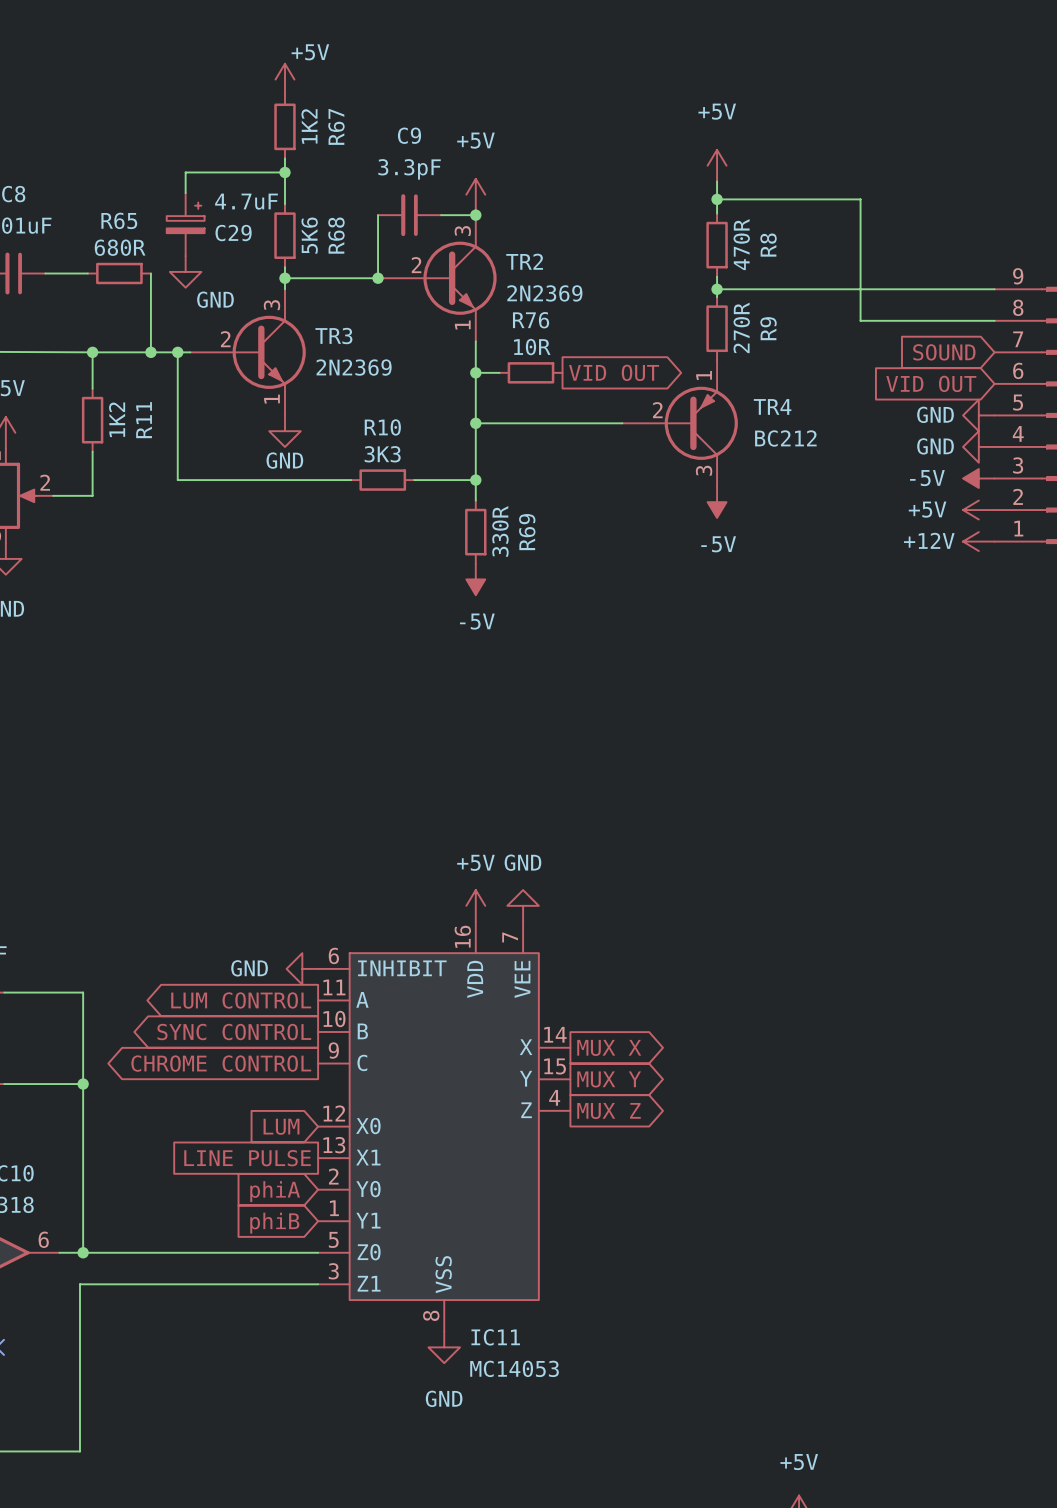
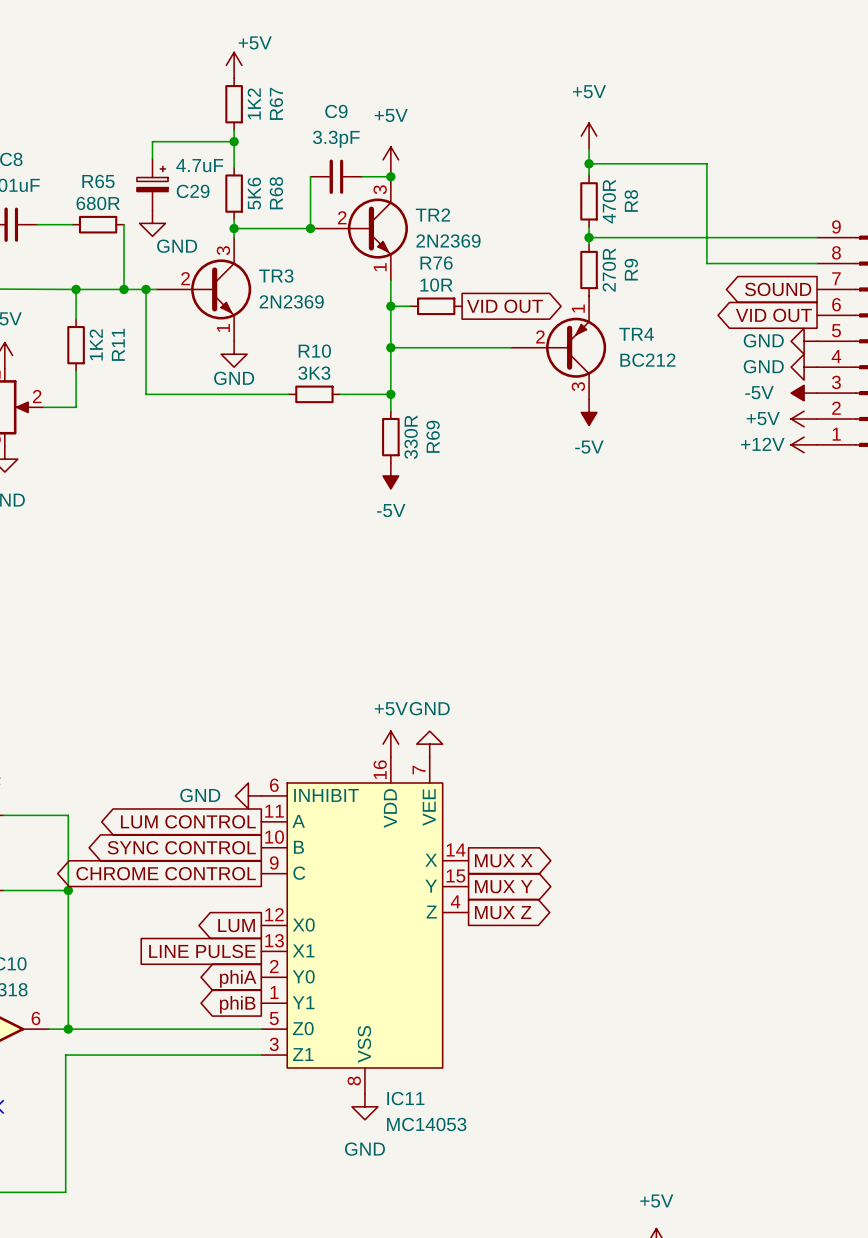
global label shape: input (944, 352) -> output (778, 289)
global label shape: input (931, 383) -> output (773, 315)
global label shape: input (281, 1126) -> output (236, 925)
global label shape: input (275, 1191) -> output (238, 978)
global label shape: input (274, 1223) -> output (237, 1004)

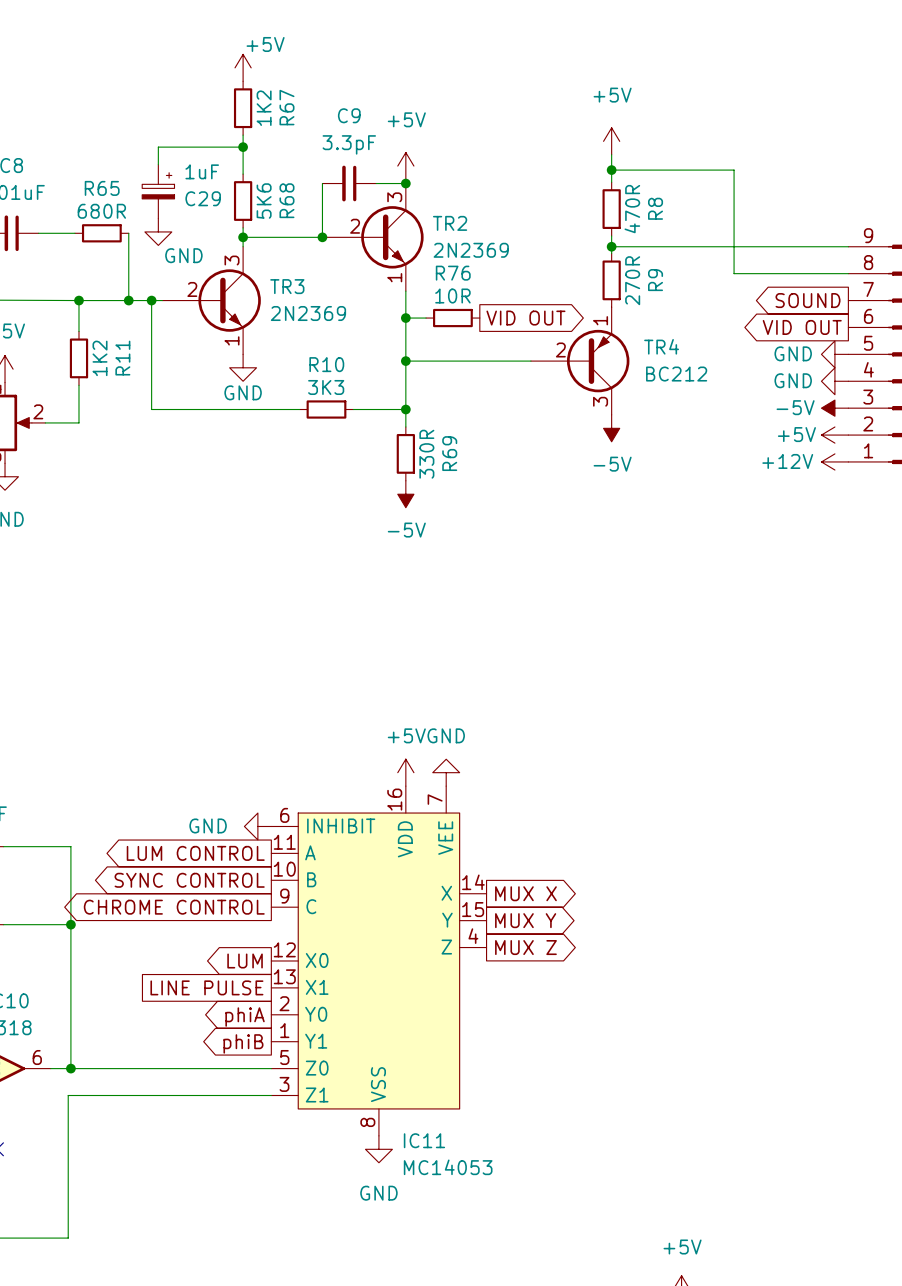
C29 value: 4.7uF (199, 165) -> 1uF (202, 171)

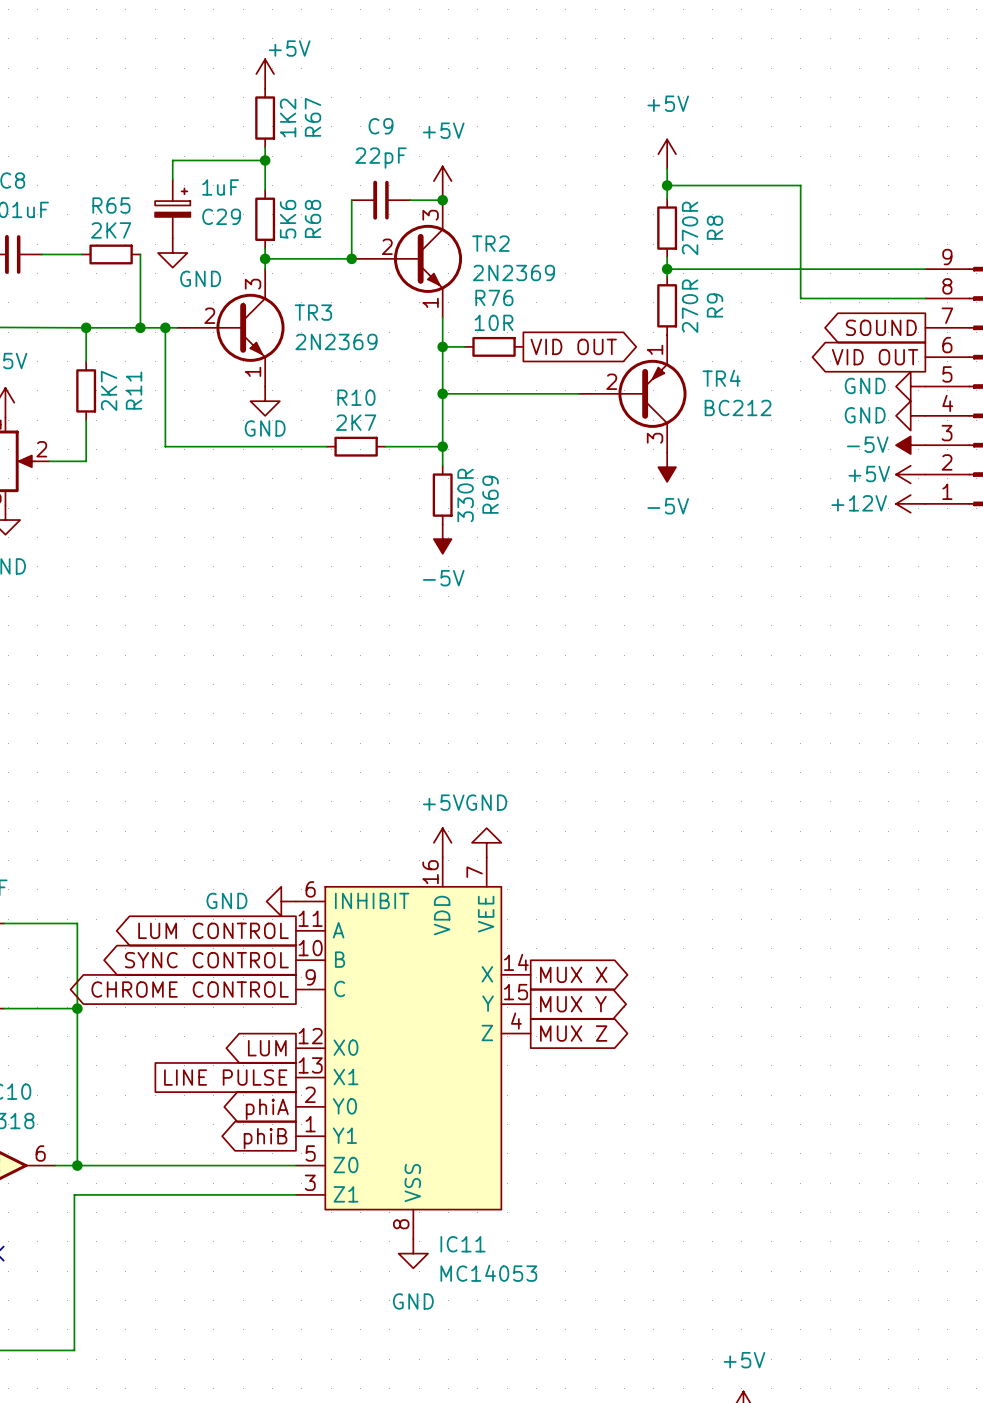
C9 value: 3.3pF (349, 144) -> 22pF (380, 158)
R8 value: 470R (632, 209) -> 270R (690, 228)
R65 value: 680R (101, 211) -> 2K7 (111, 230)
R11 value: 1K2 (100, 358) -> 2K7 (109, 390)
R10 value: 3K3 (326, 387) -> 2K7 (356, 422)

